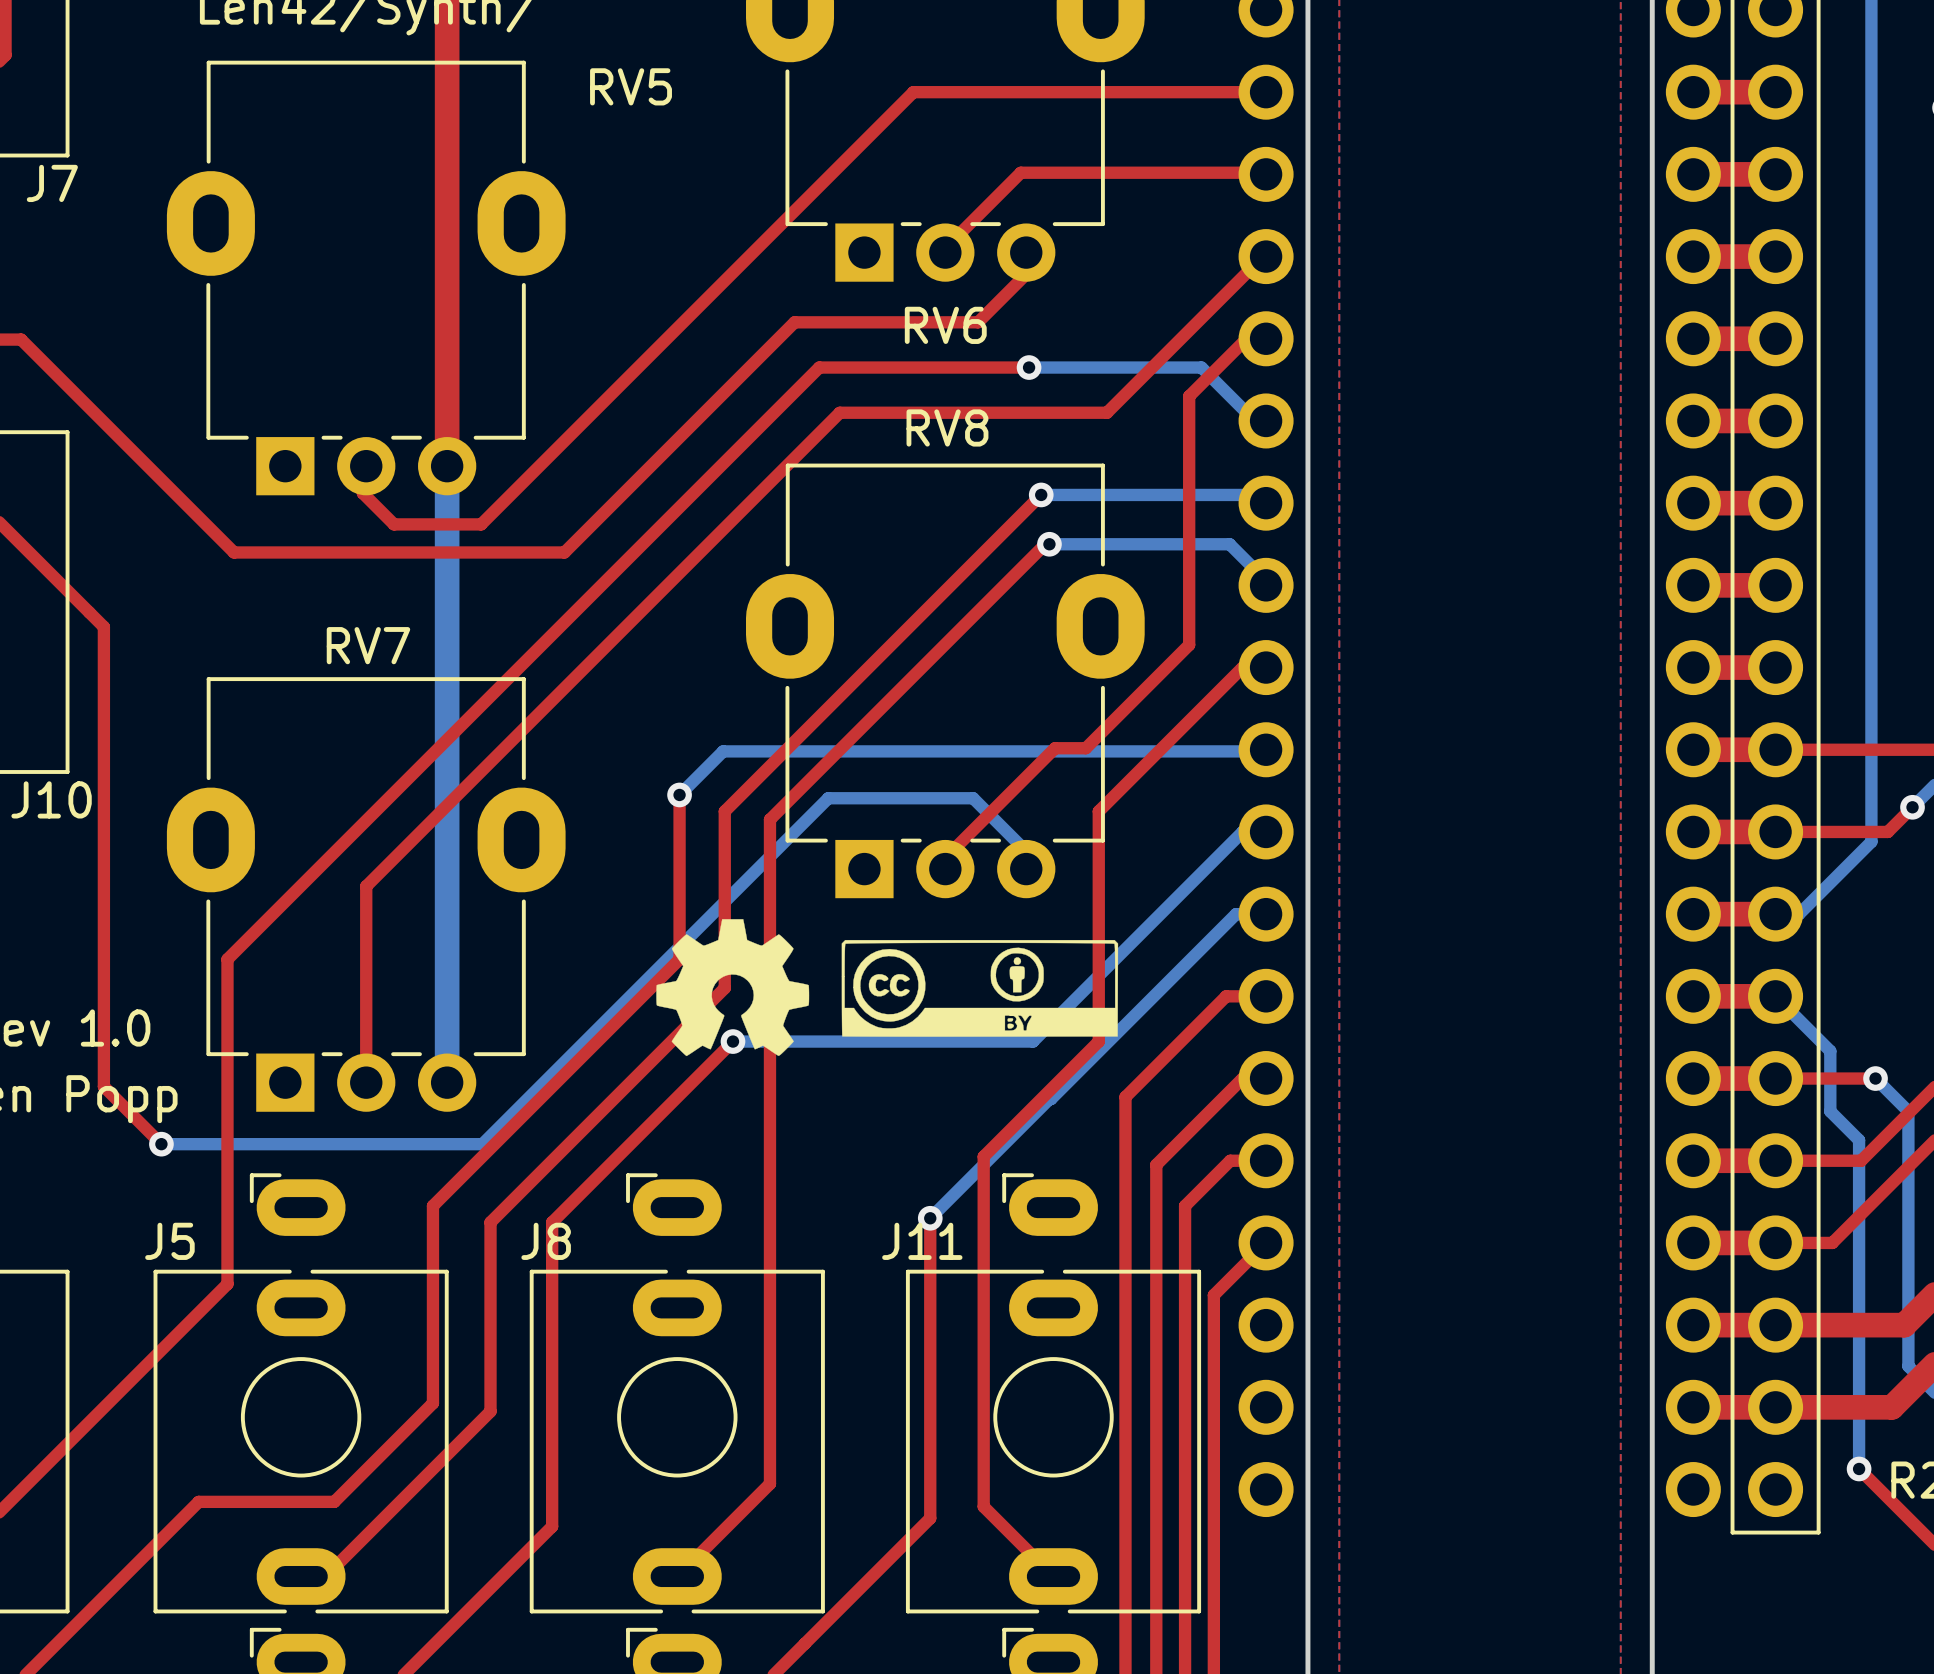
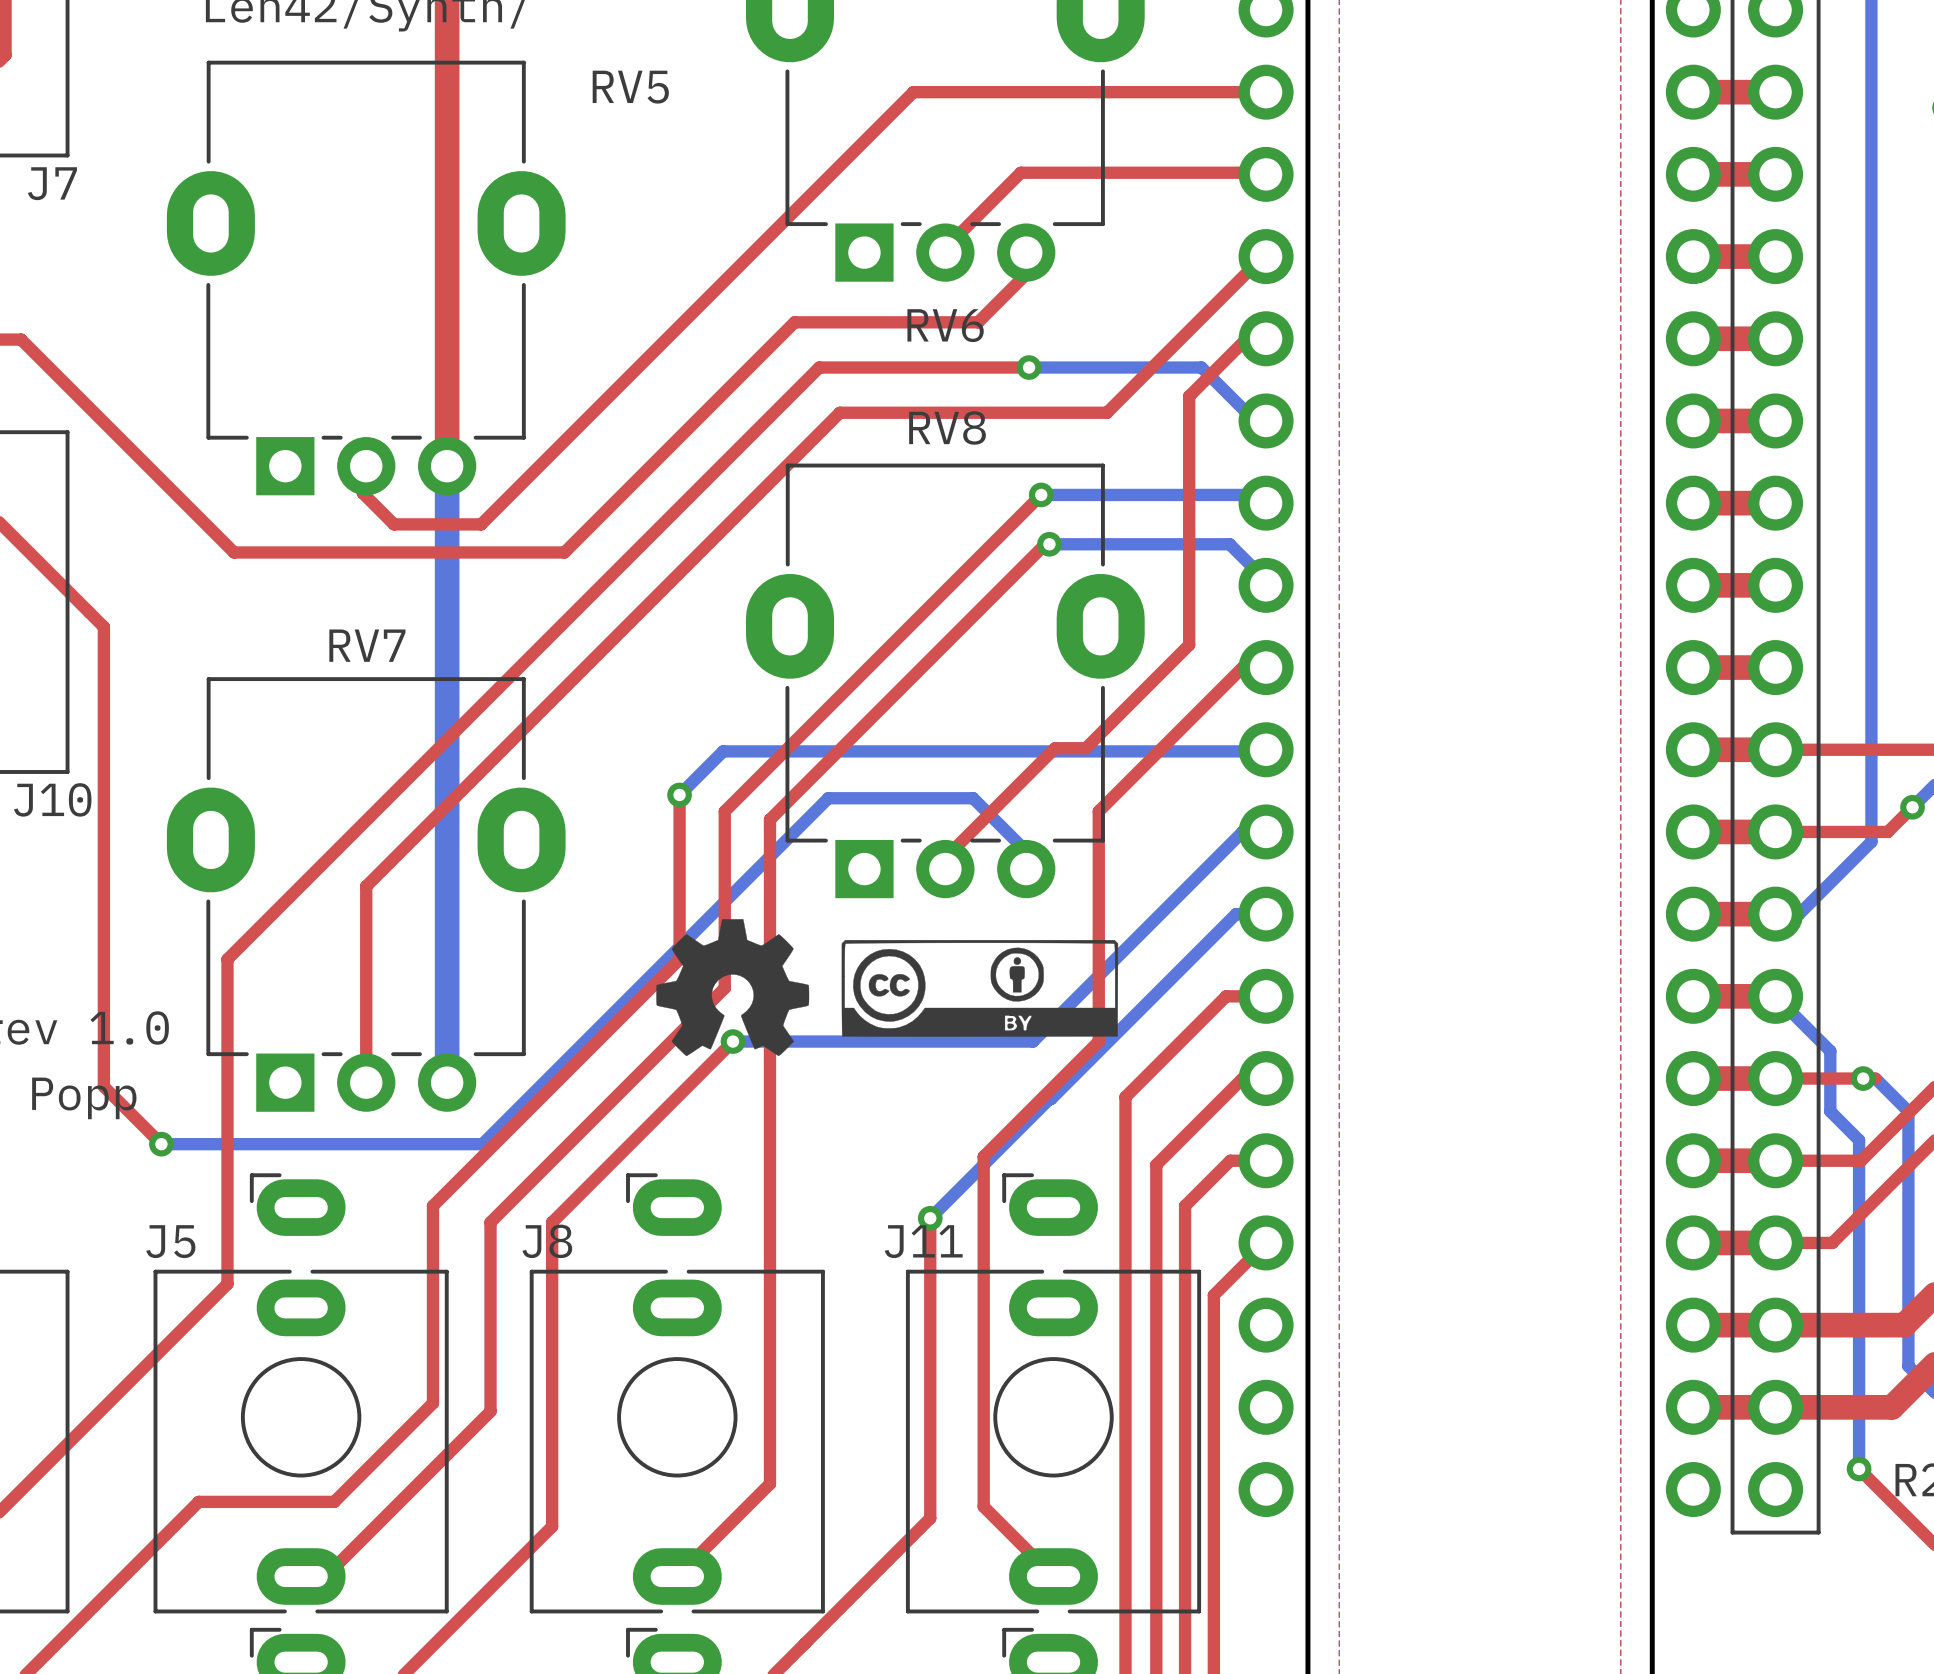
via position: (1875, 1078) -> (1863, 1078)

